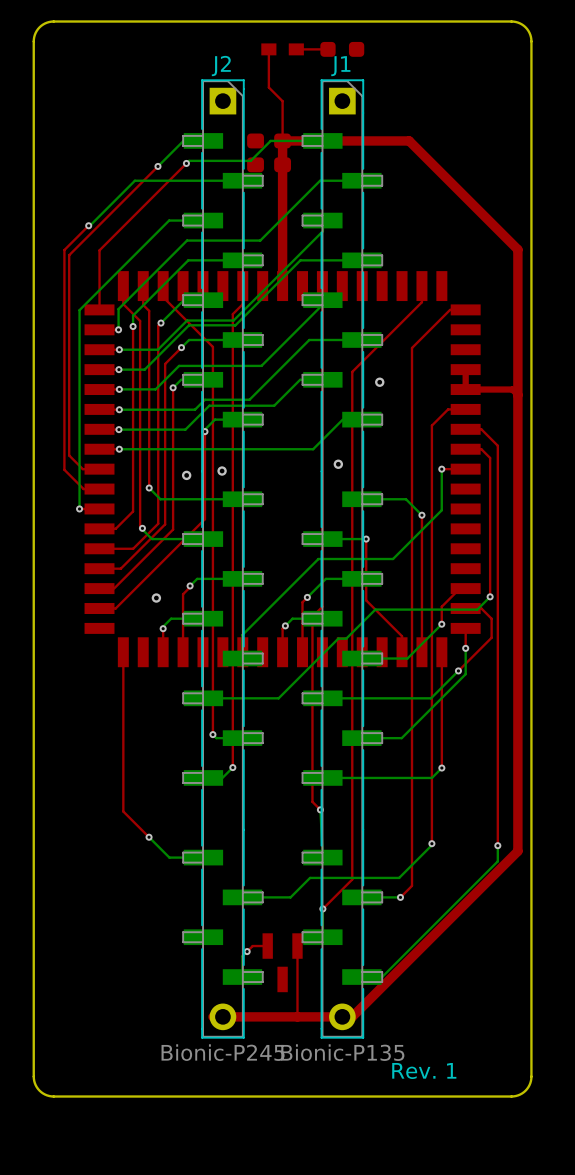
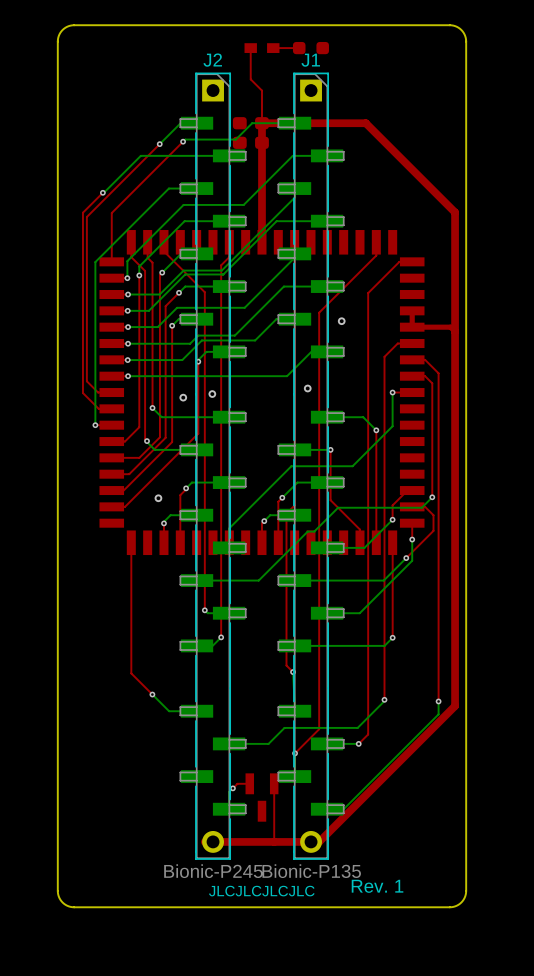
text: none -> JLCJLCJLCJLC (261, 891)

